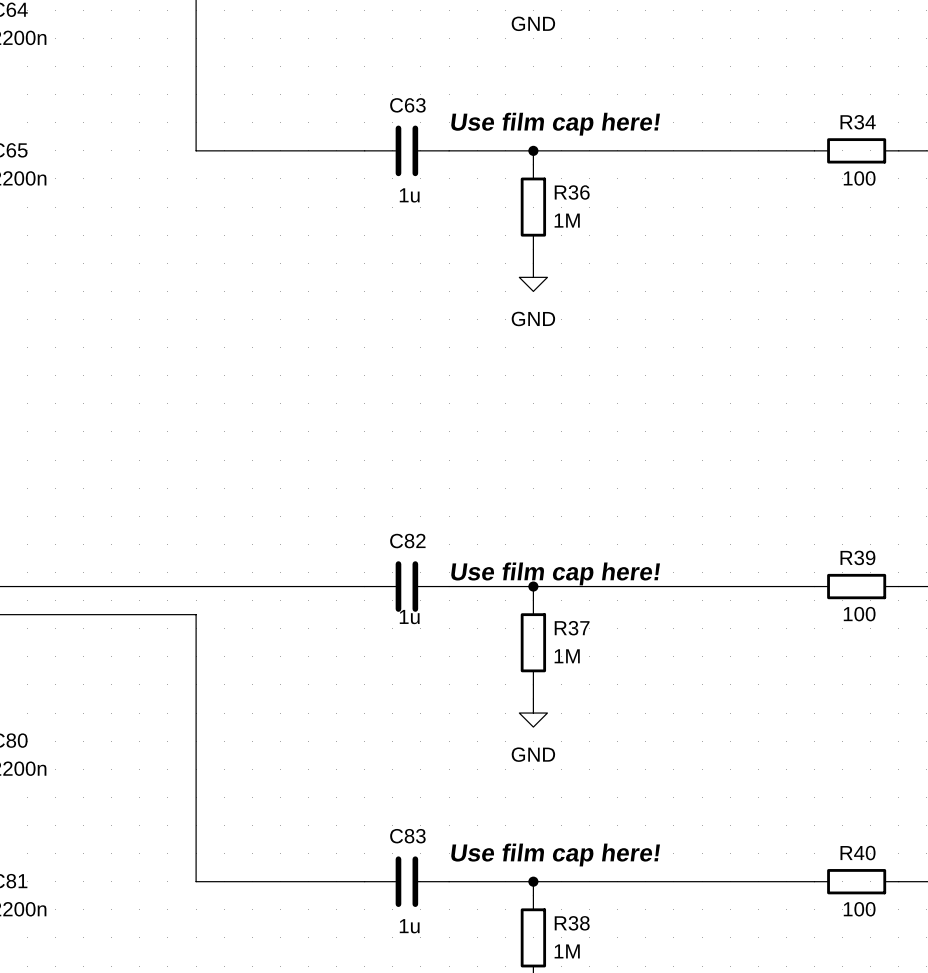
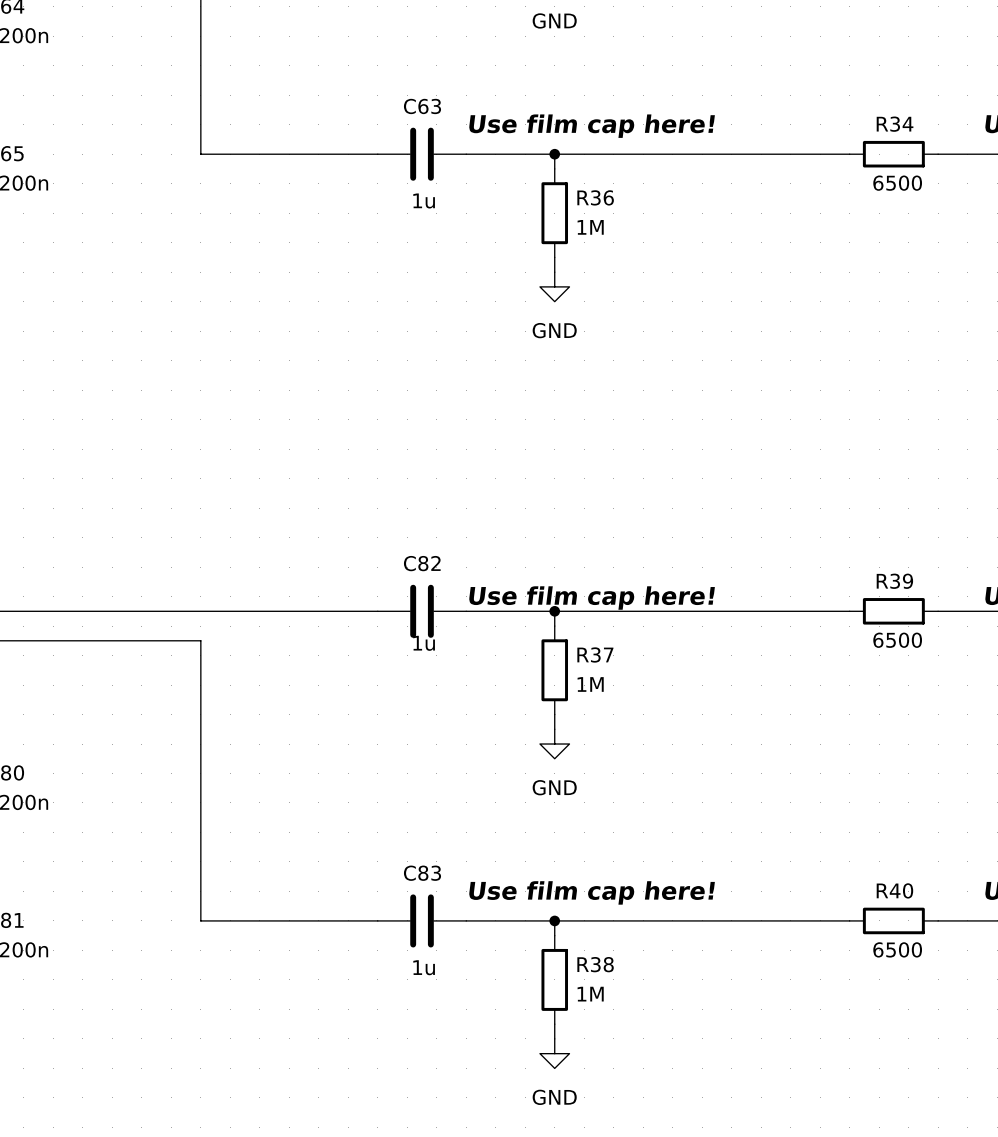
R34 value: 100 (859, 178) -> 6500 (897, 183)
R39 value: 100 (859, 614) -> 6500 (897, 640)
R40 value: 100 (859, 909) -> 6500 (897, 949)

